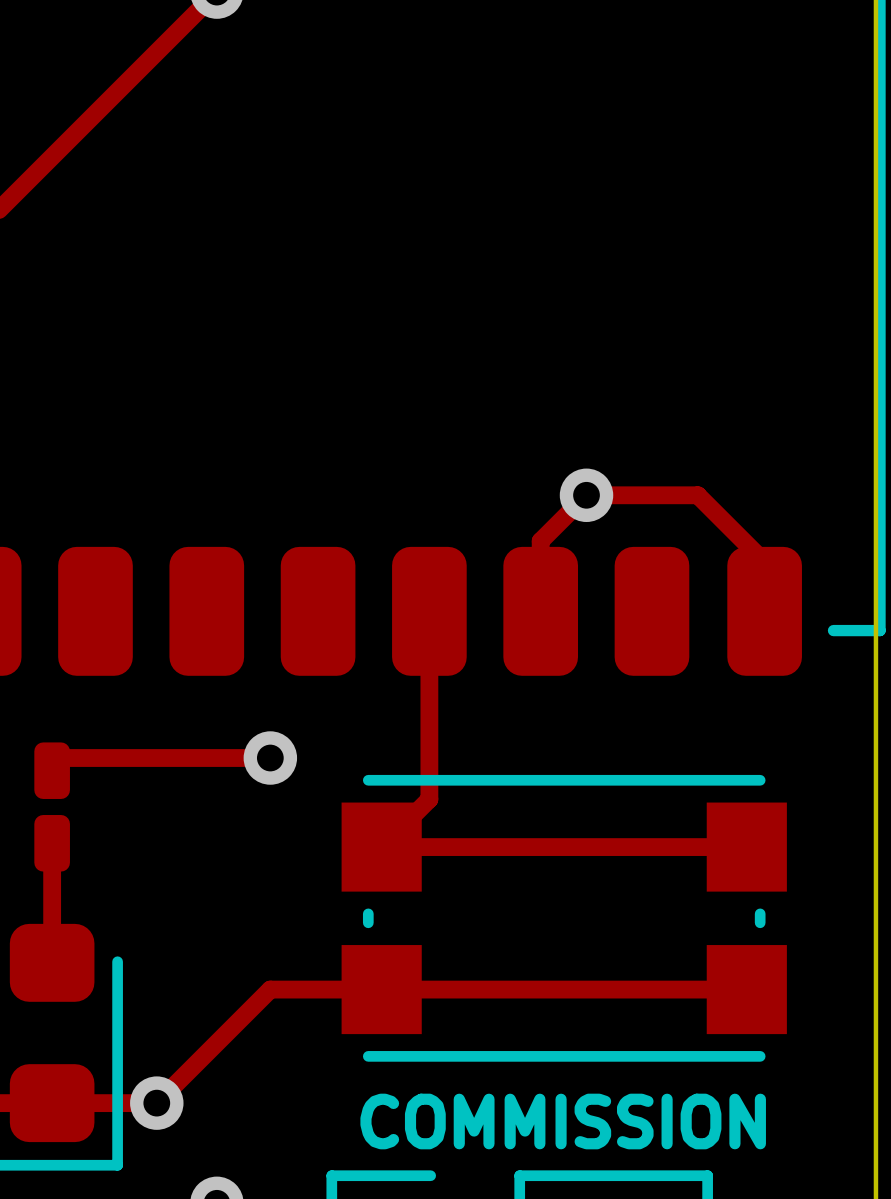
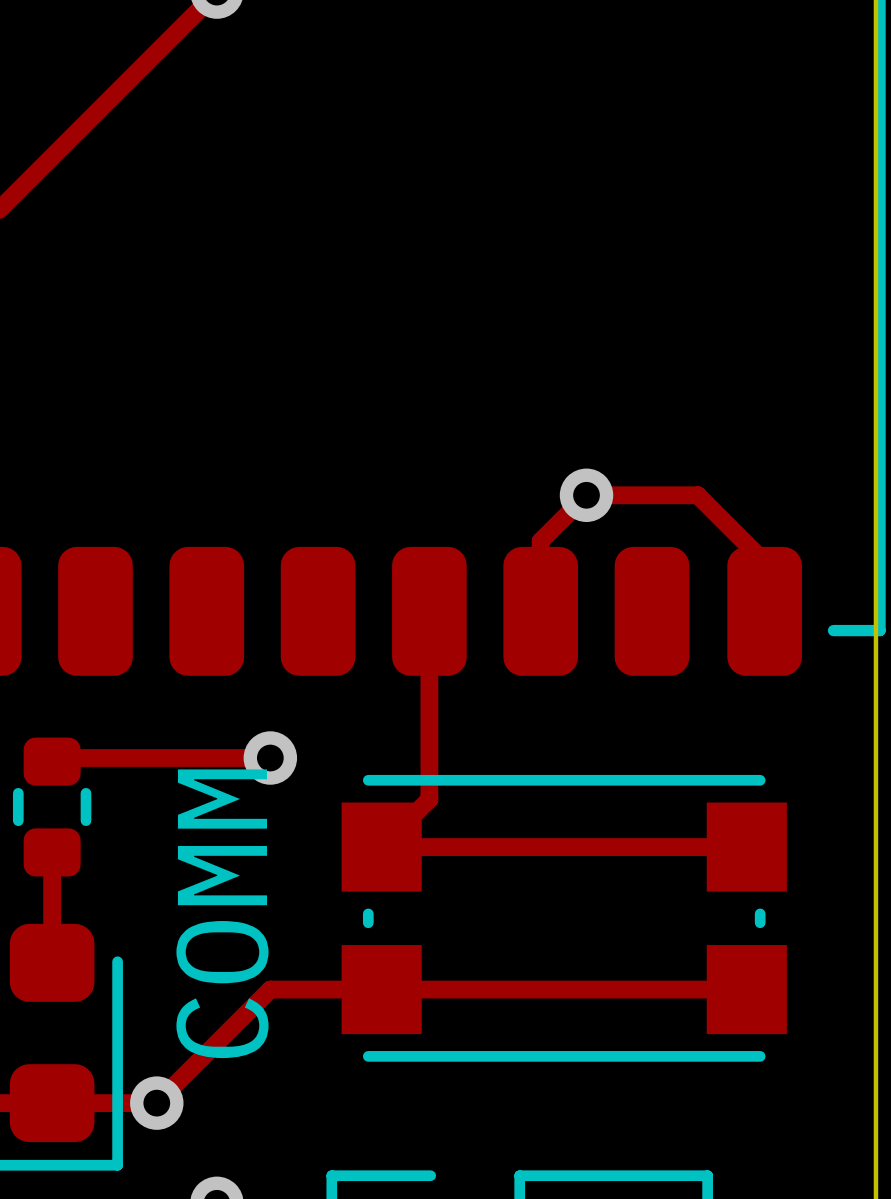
part footprint: [34, 742, 70, 872] -> [12, 737, 92, 877]
part value: COMMISSION (563, 1121) -> COMM (222, 913)

